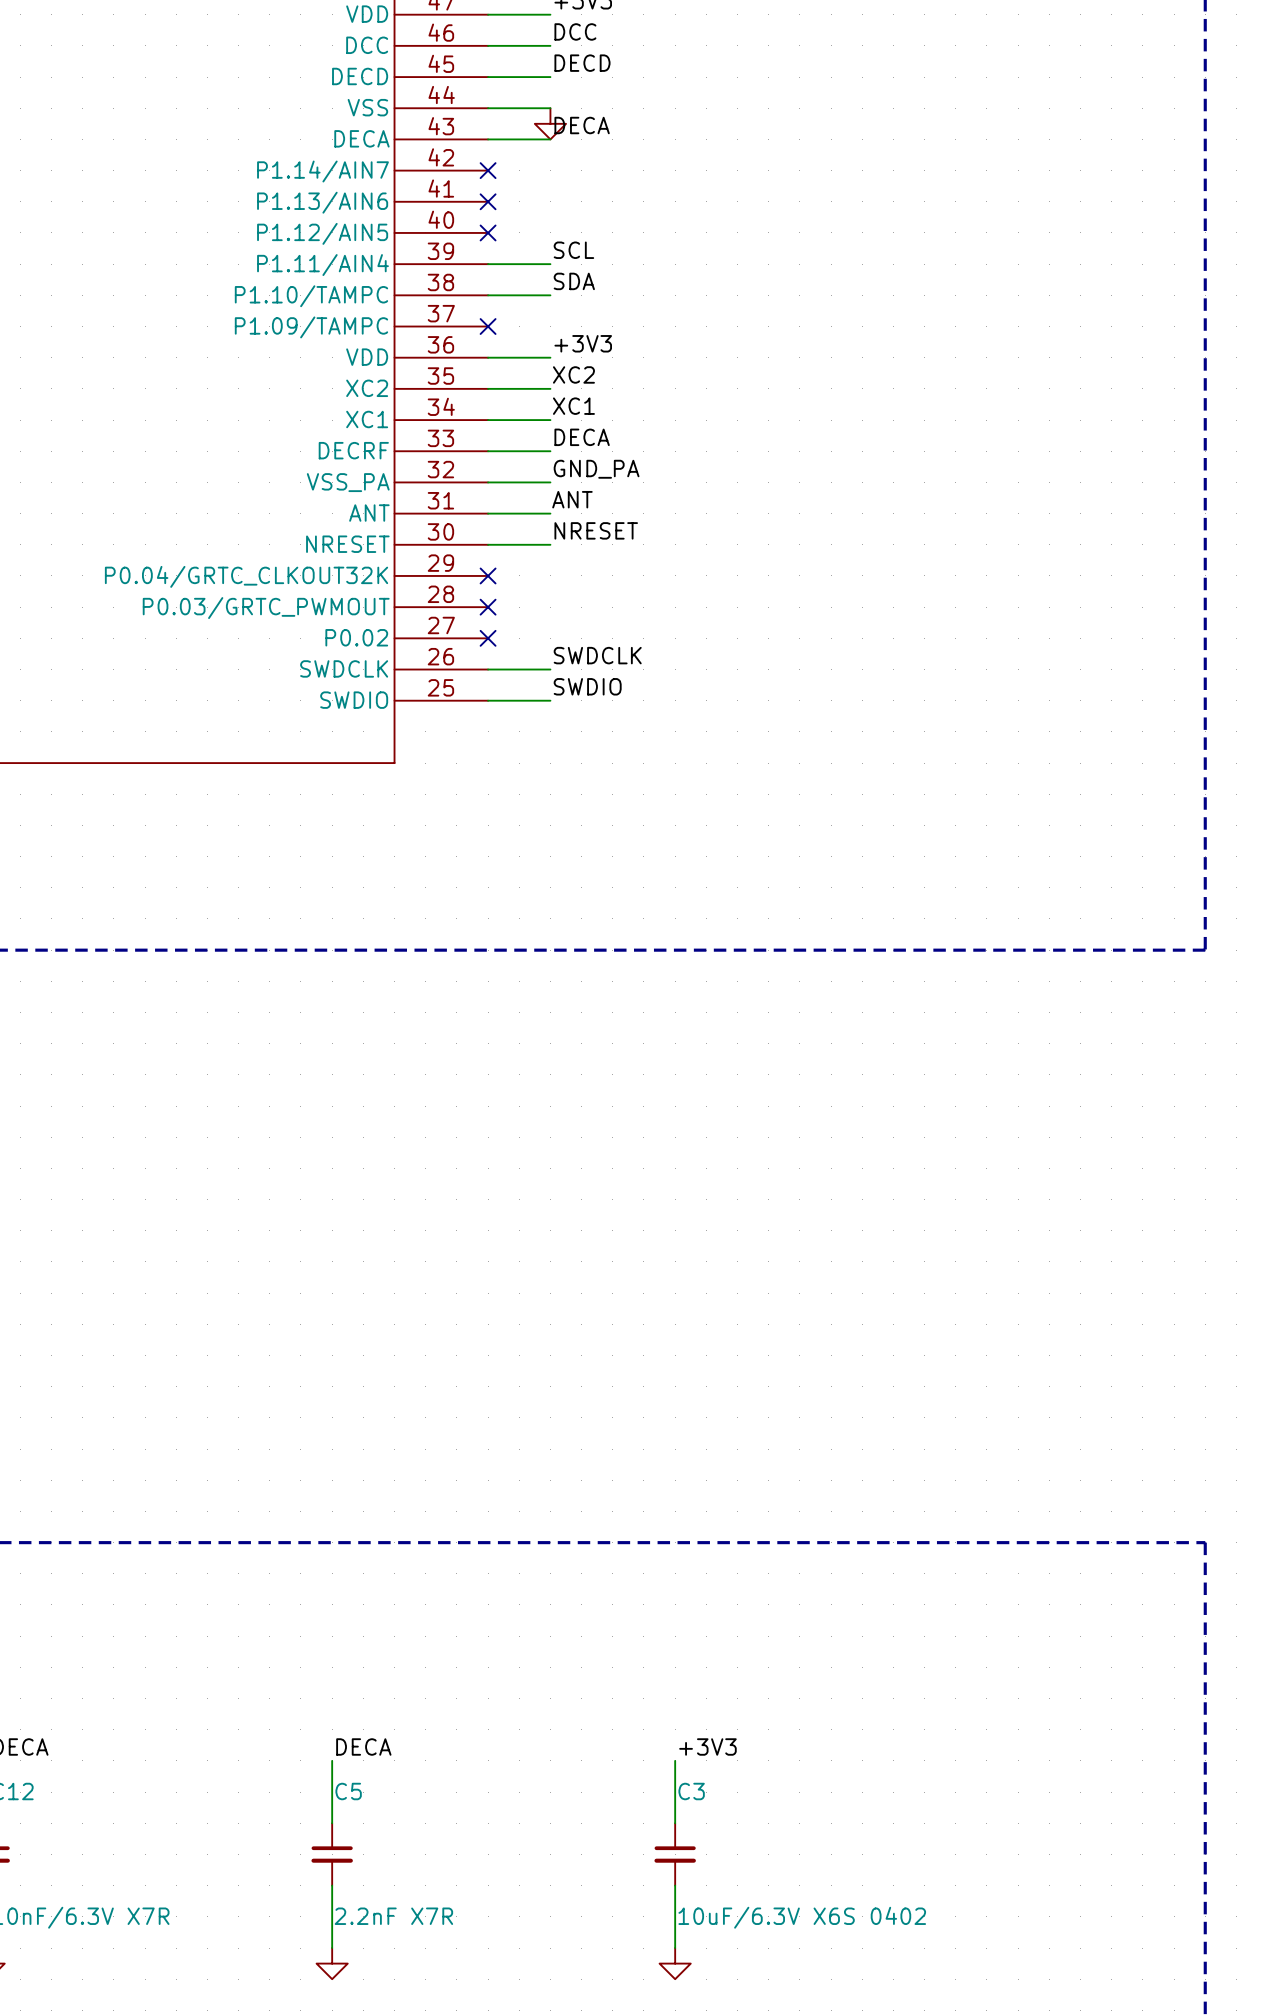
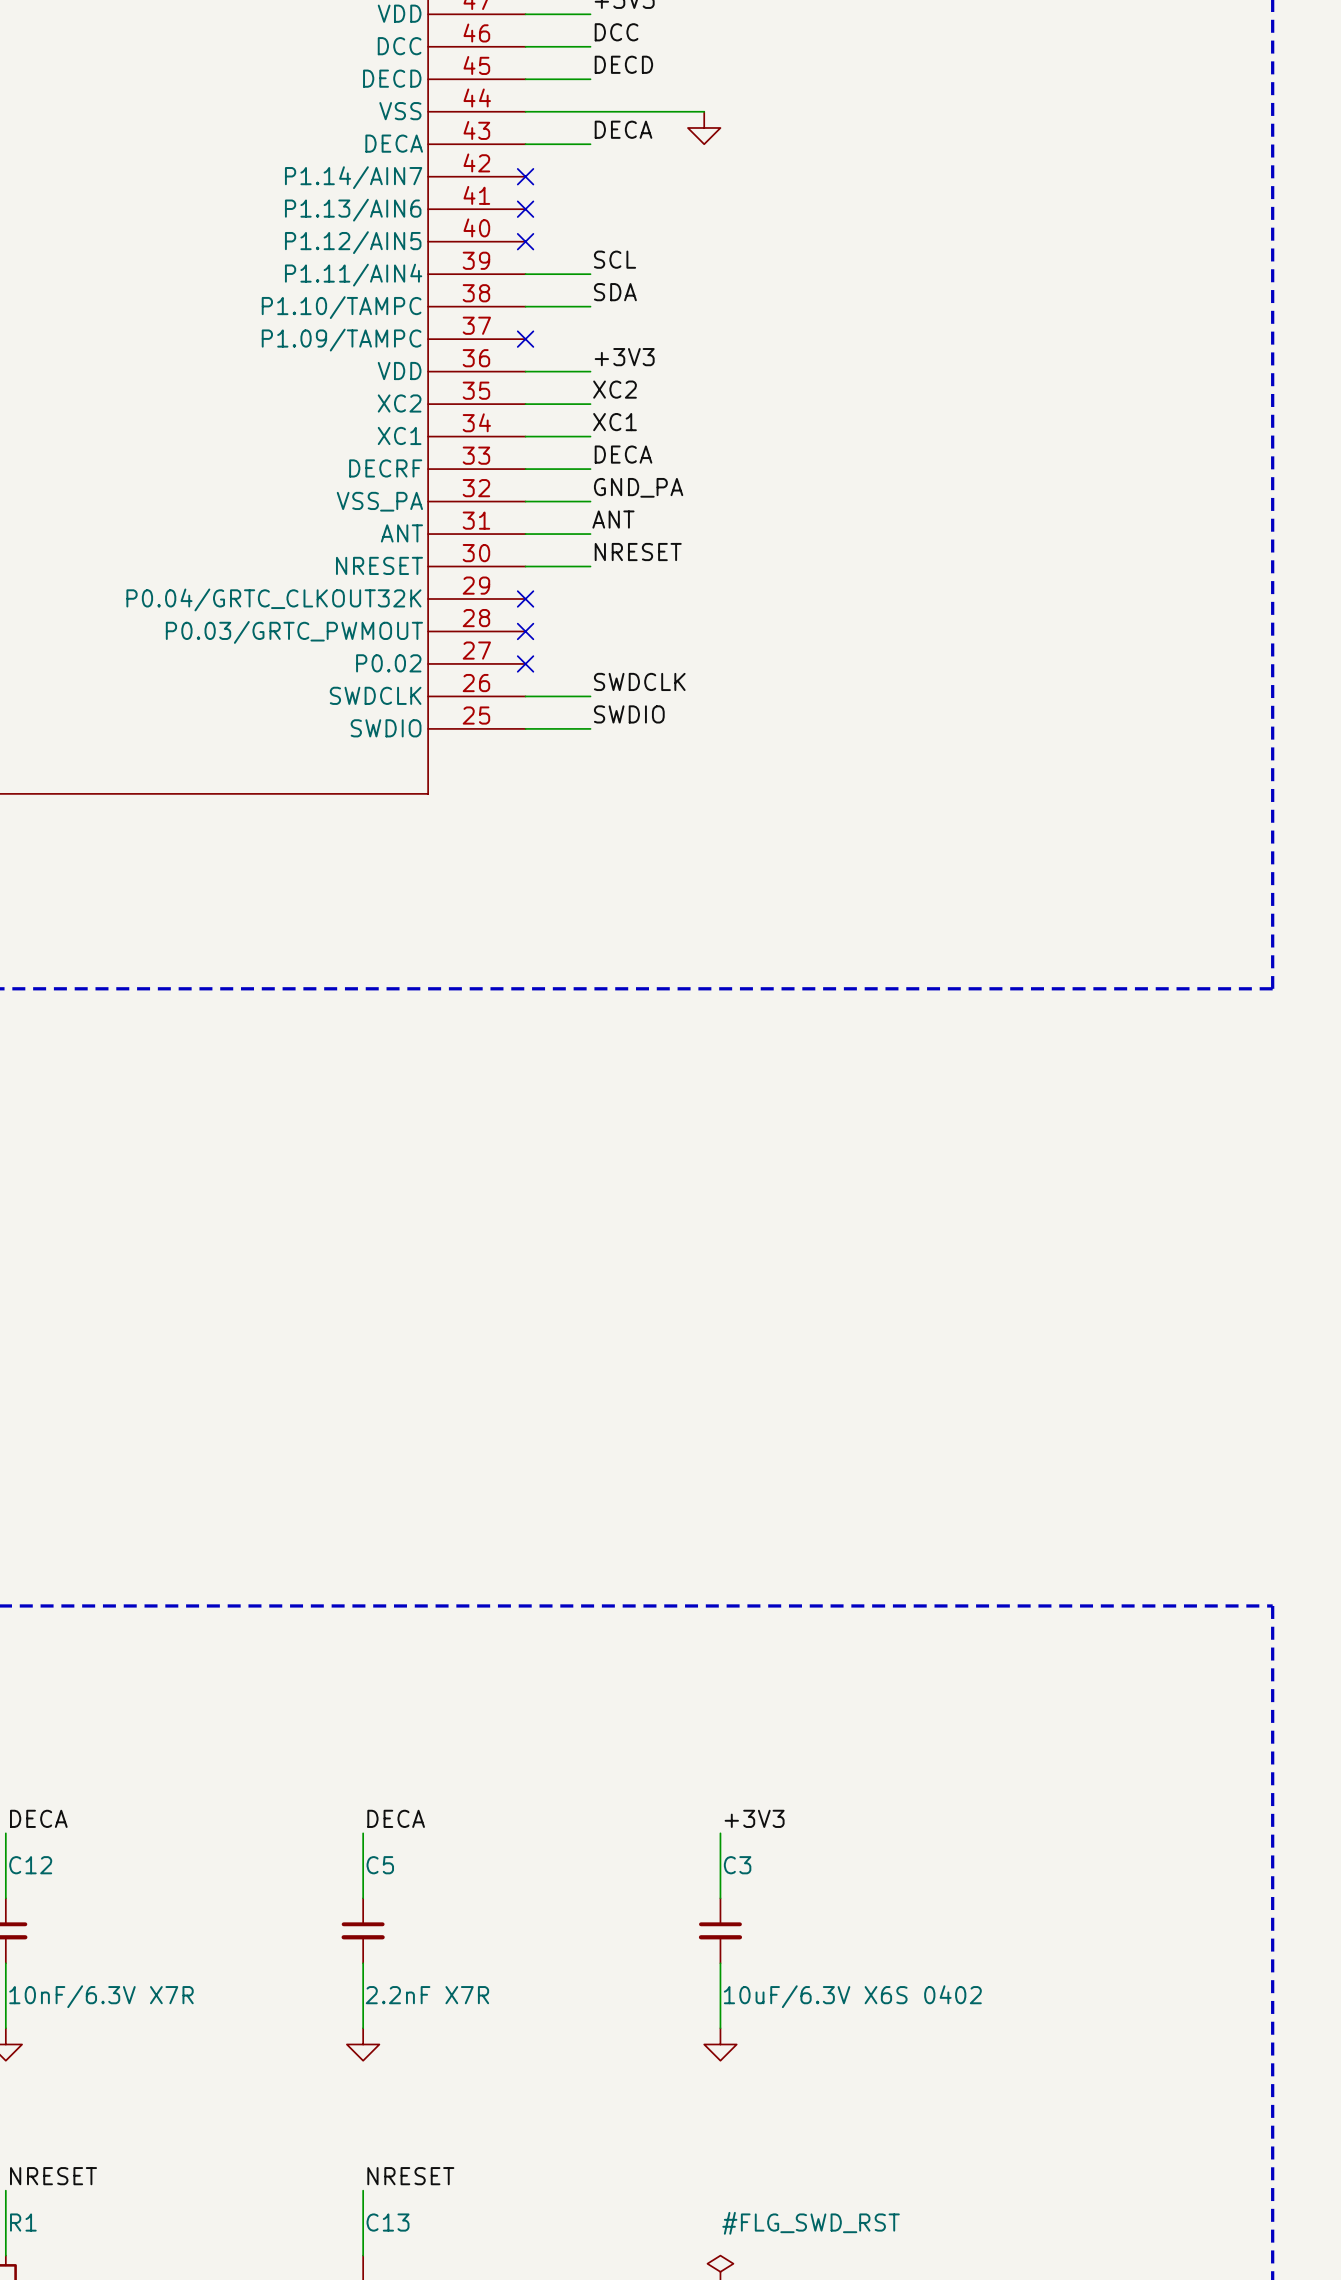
wire: none -> (590, 111) (704, 111)
power symbol: (550, 123) -> none
power symbol: none -> (704, 127)

